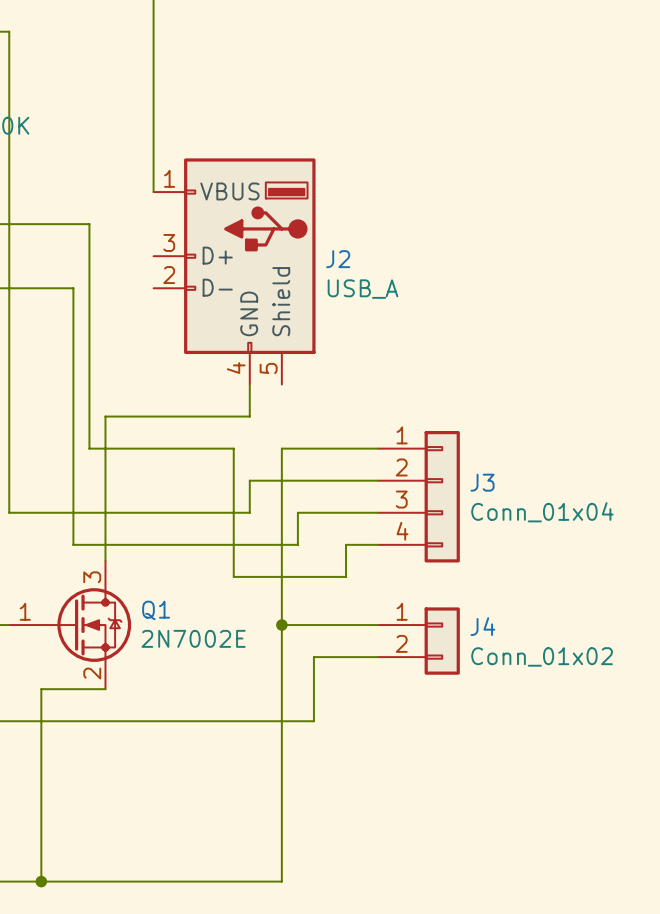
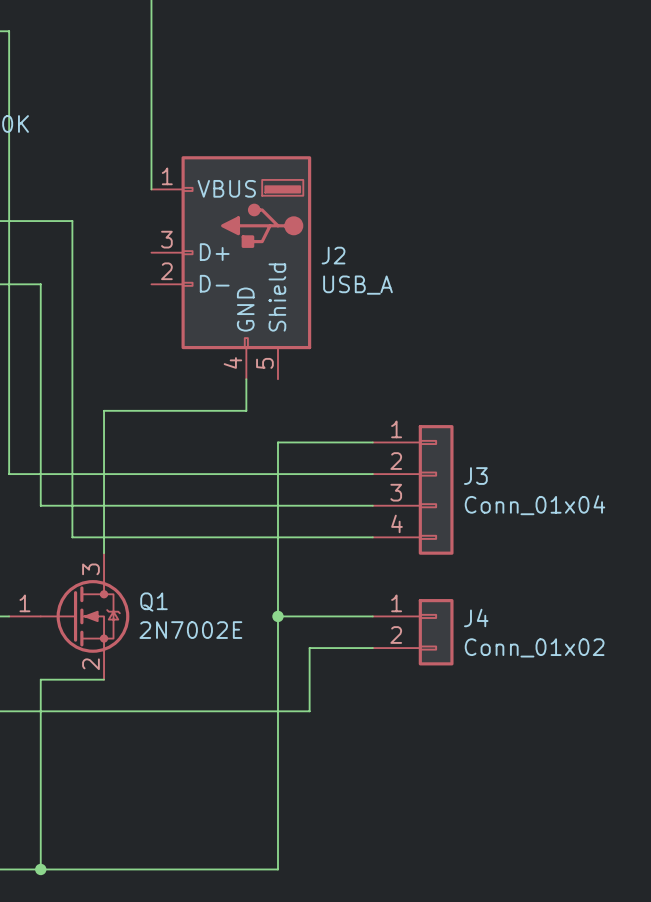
wire: (73, 224) (89, 224) (89, 448) (233, 448) (233, 576) (346, 576) (346, 544) -> none
wire: (41, 288) (73, 288) -> (72, 221) (72, 284)
wire: (9, 480) (9, 512) (41, 512) -> (40, 284) (40, 505)
wire: none -> (9, 474) (246, 474)
wire: (249, 480) (249, 512) -> (293, 505) (246, 505)
wire: (297, 512) (297, 544) -> (341, 537) (293, 537)

